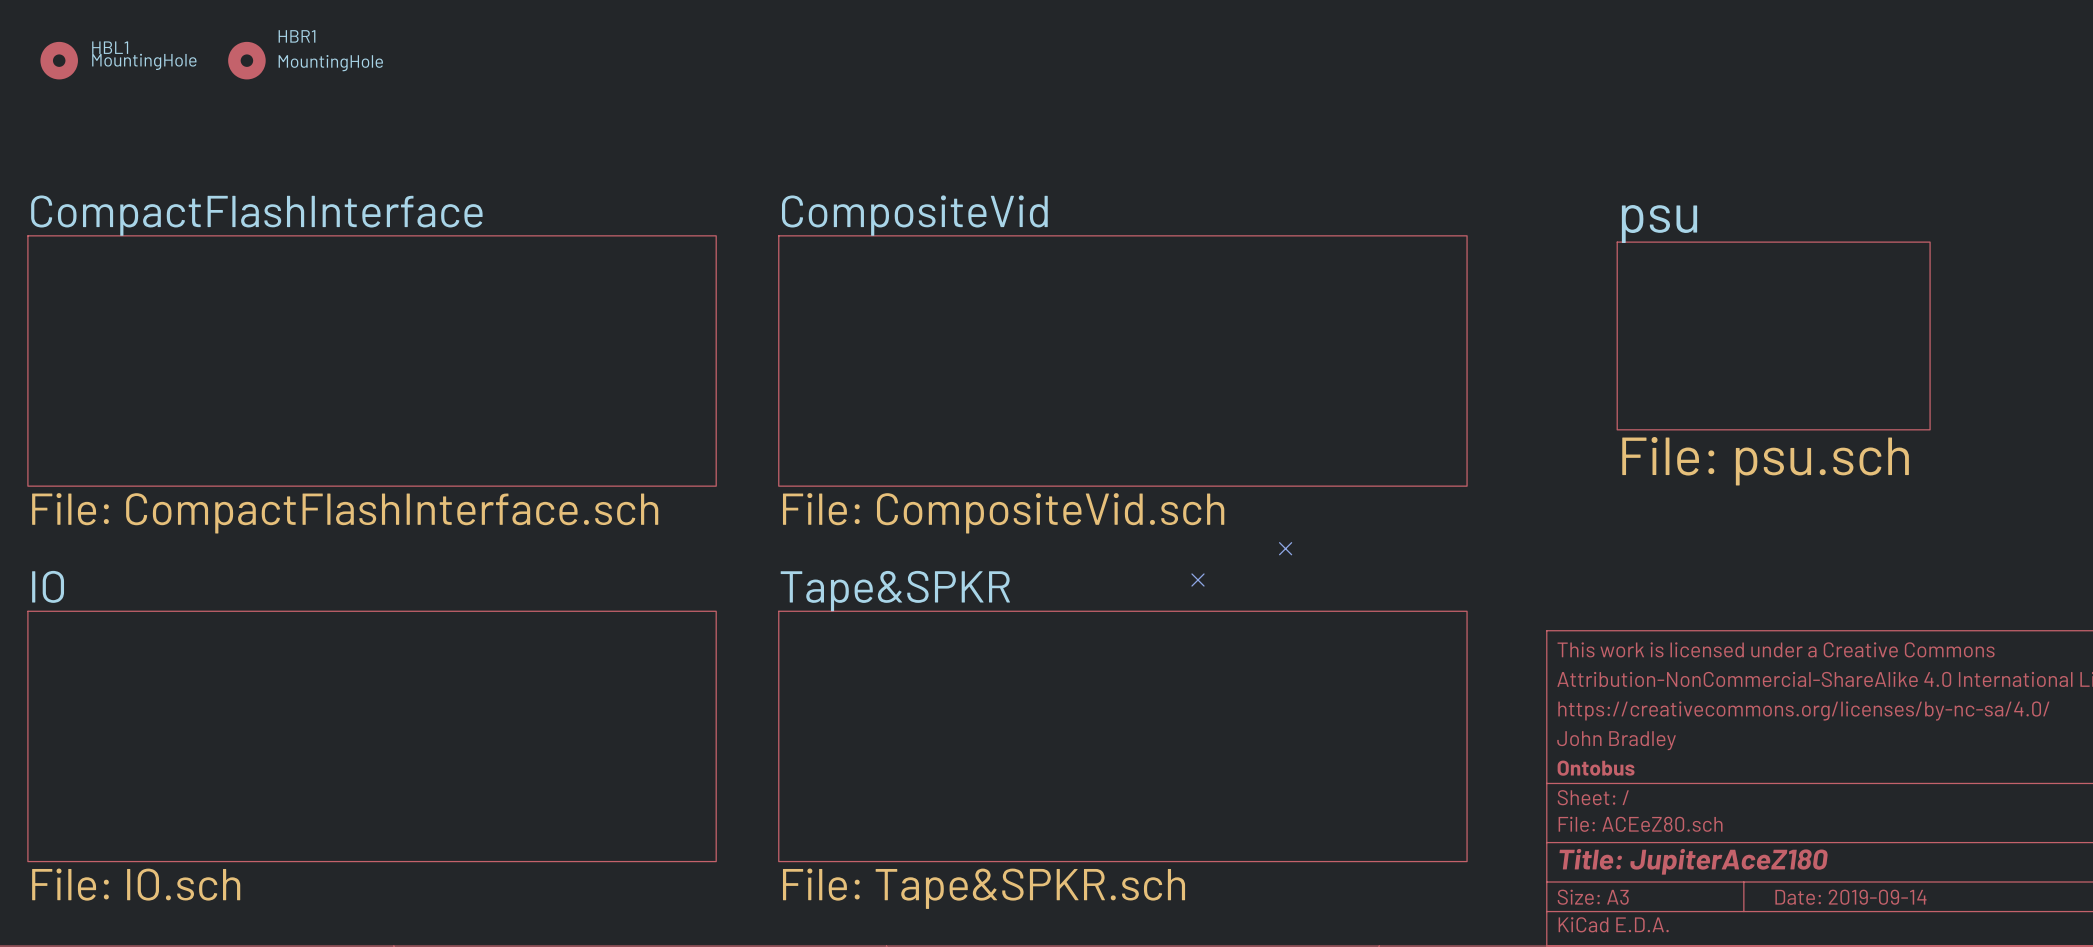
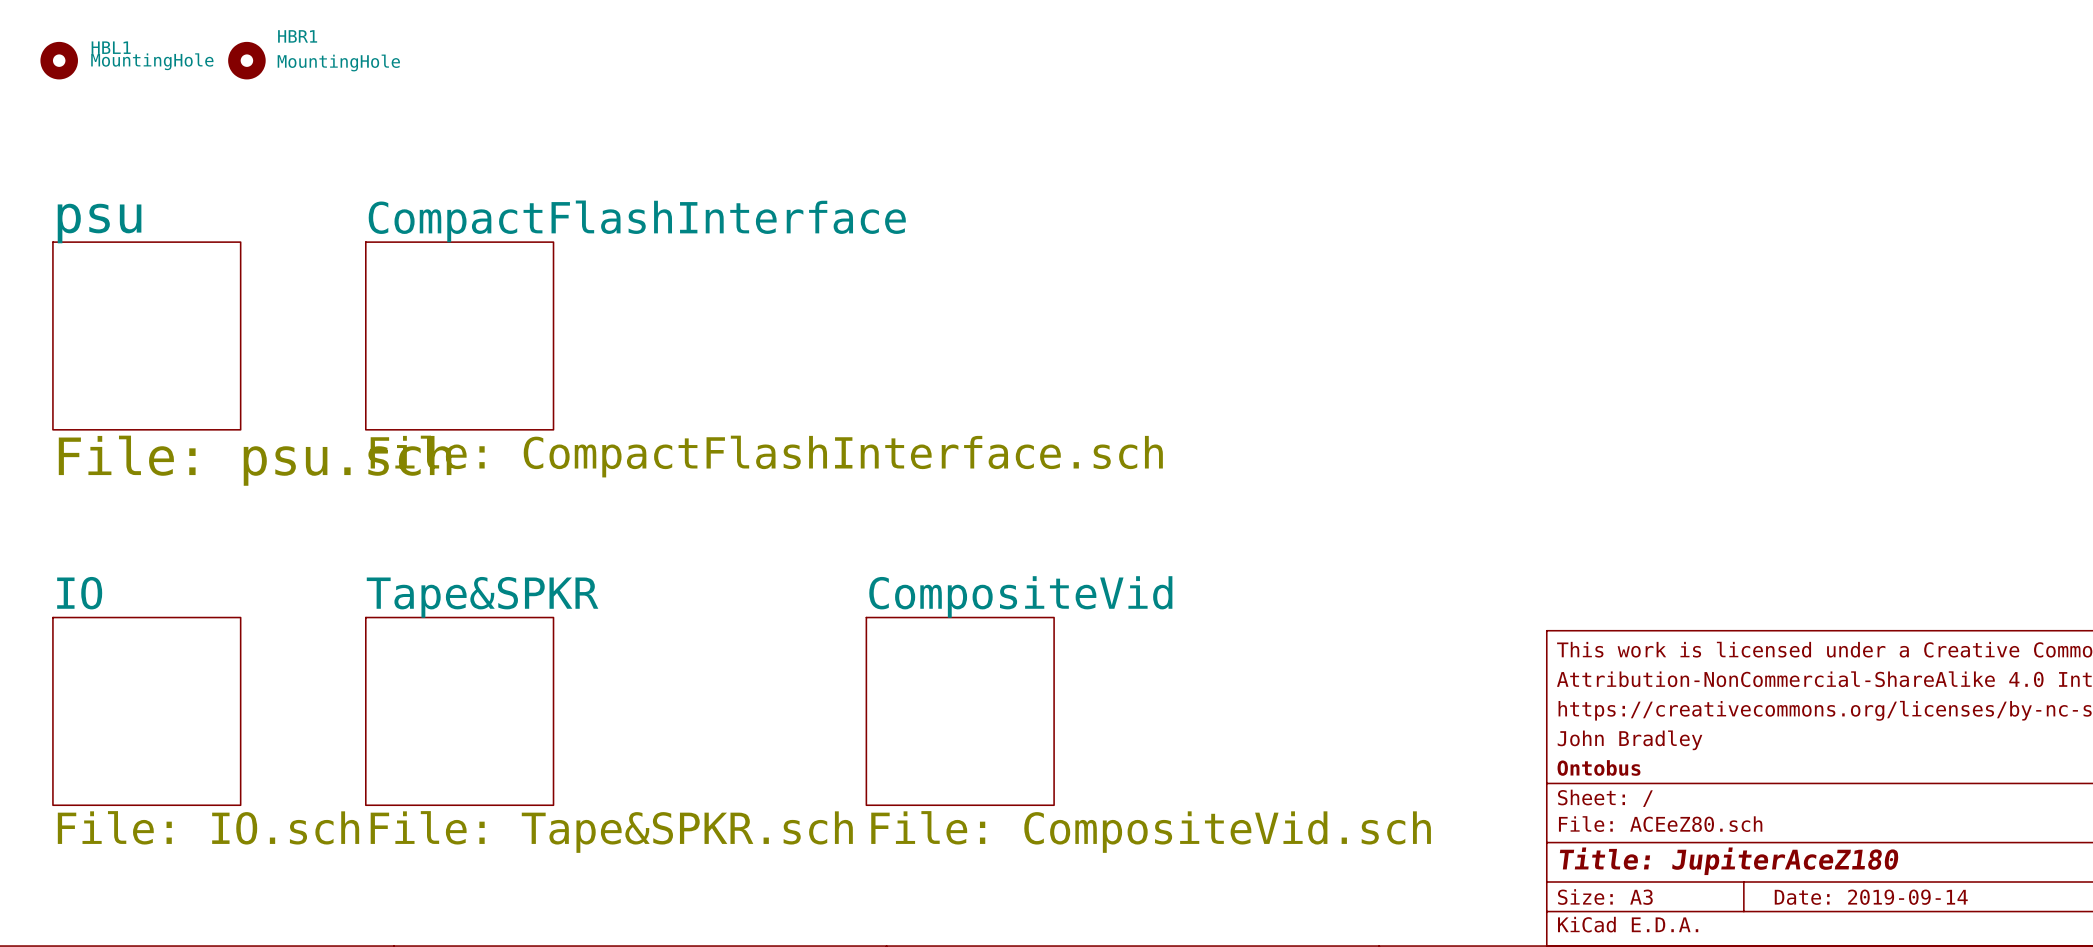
sheet psu: none -> File: psu.sch (146, 335)
sheet CompactFlashInterface: none -> File: CompactFlashInterface.sch (459, 335)
sheet psu: File: psu.sch (1773, 335) -> none
sheet CompactFlashInterface: File: CompactFlashInterface.sch (372, 360) -> none
sheet CompositeVid: File: CompositeVid.sch (1122, 360) -> none
no-connect mark: (1285, 548) -> none
no-connect mark: (1197, 579) -> none
sheet IO: none -> File: IO.sch (146, 711)
sheet Tape&SPKR: none -> File: Tape&SPKR.sch (459, 711)
sheet CompositeVid: none -> File: CompositeVid.sch (960, 711)
sheet IO: File: IO.sch (372, 736) -> none
sheet Tape&SPKR: File: Tape&SPKR.sch (1122, 736) -> none

